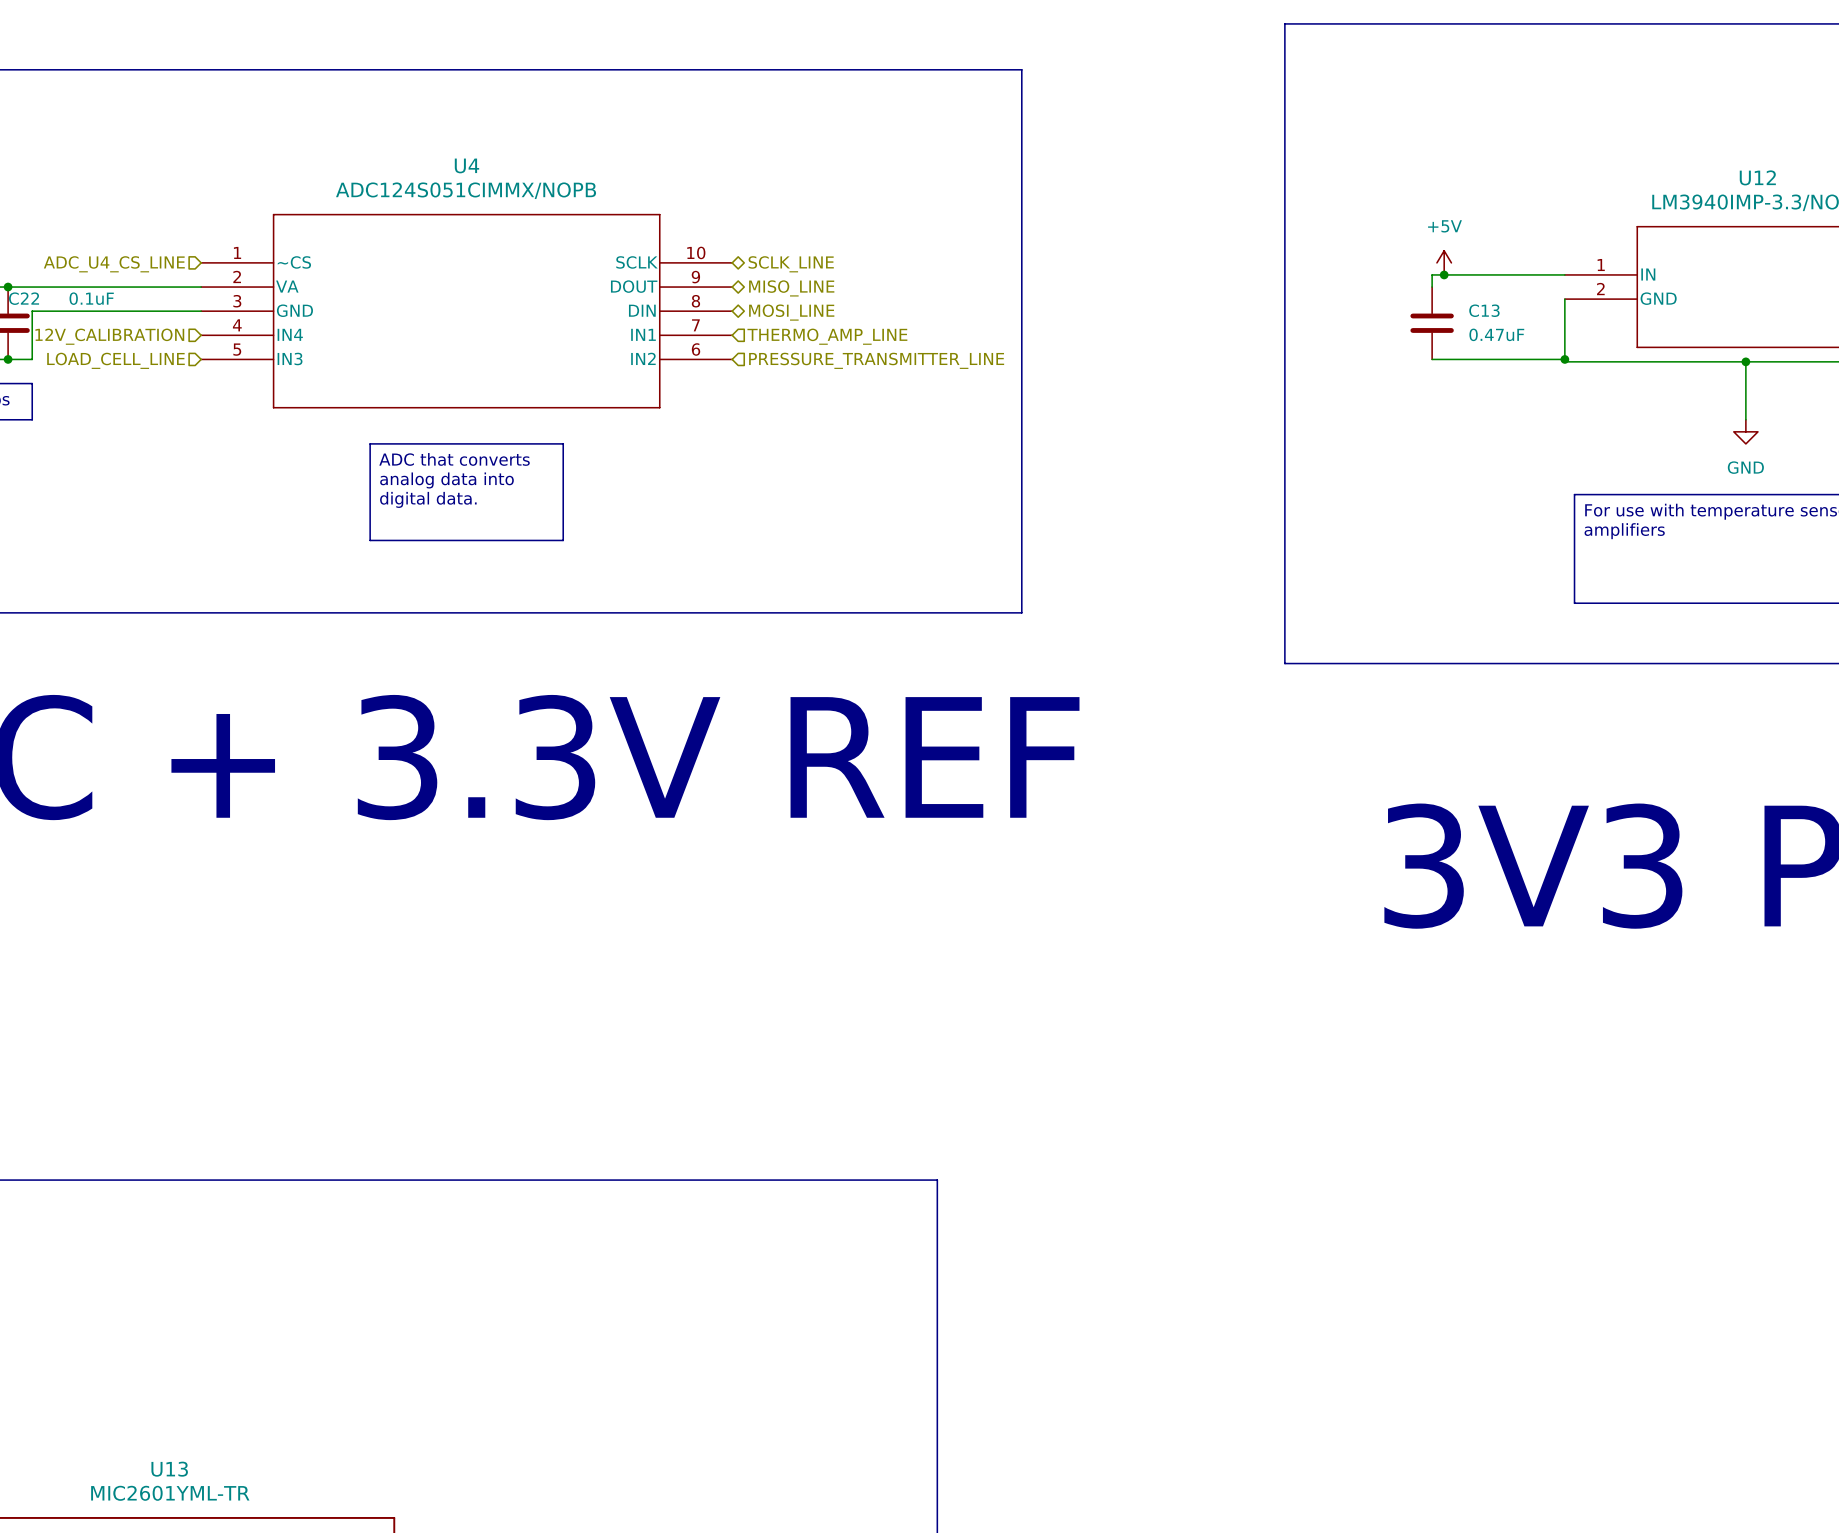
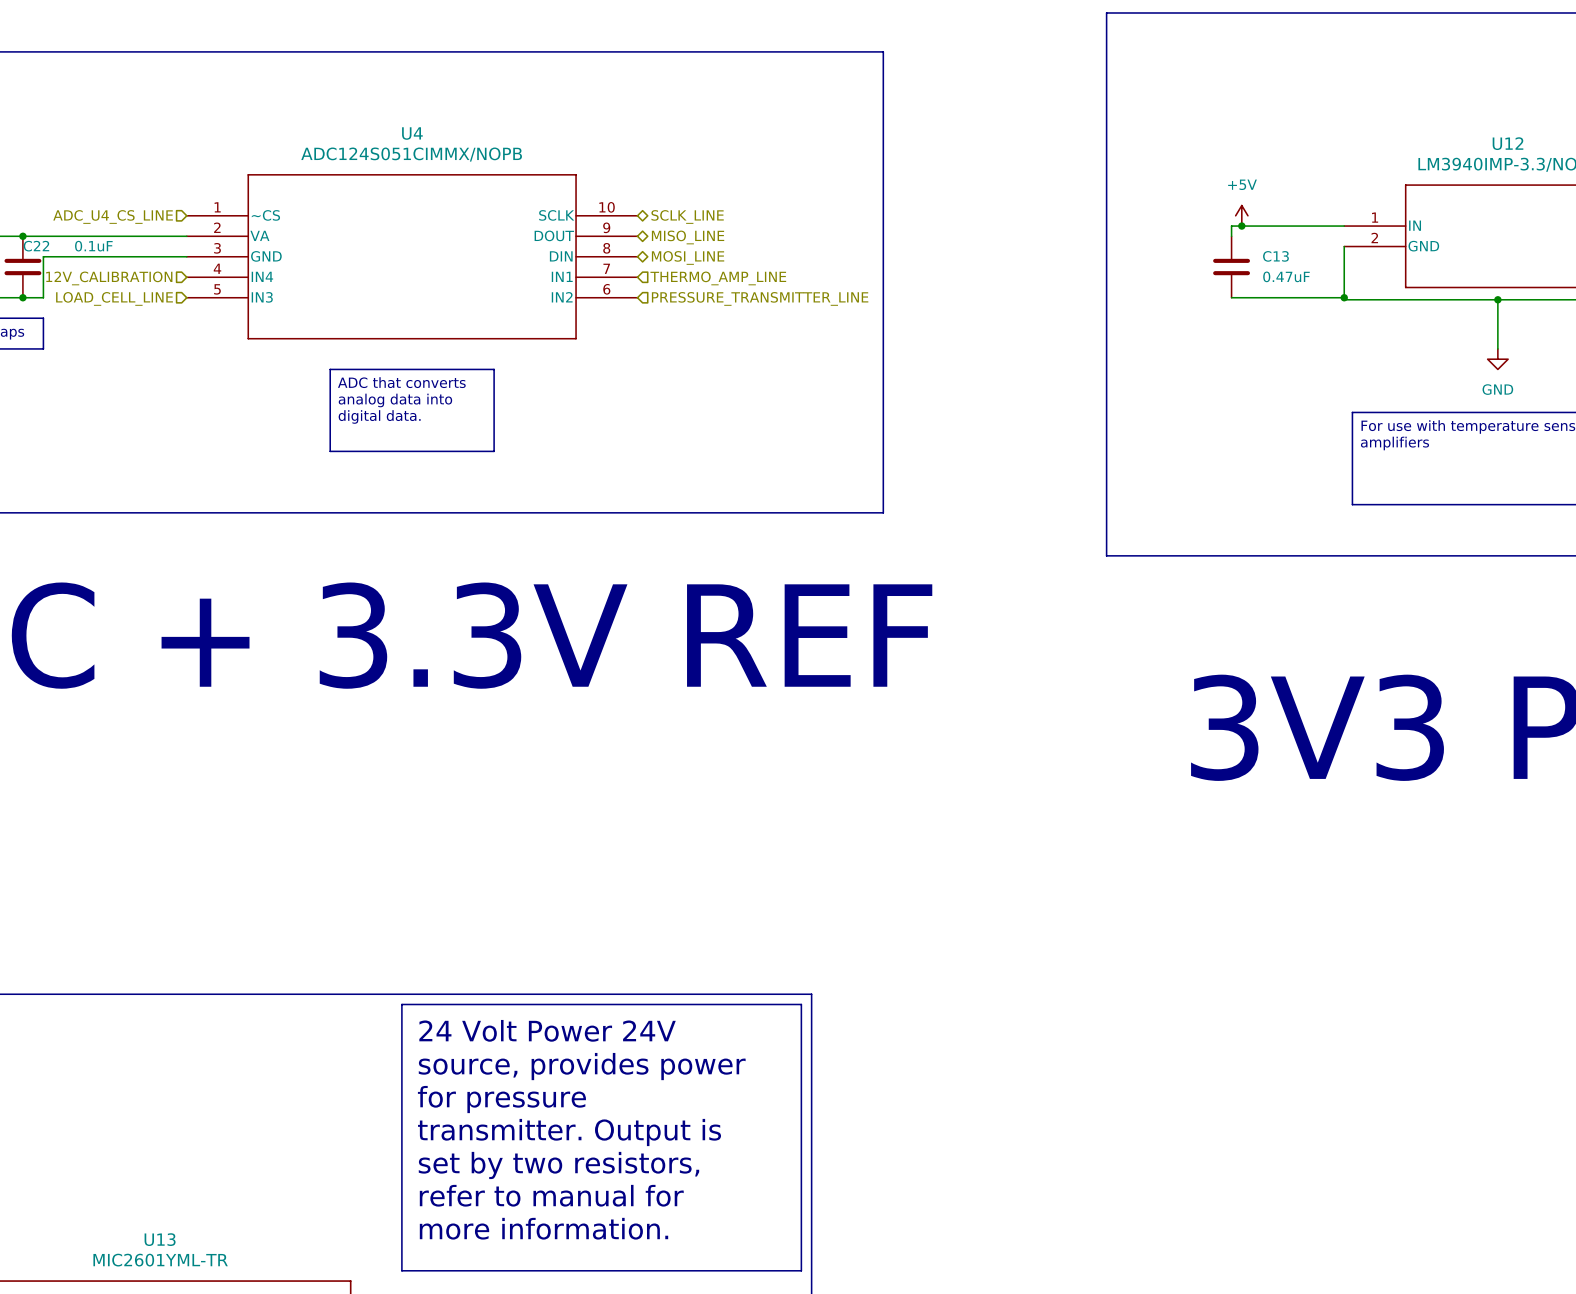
line: none -> (401, 1004) (801, 1004) (801, 1270) (401, 1270) (401, 1004)
text: none -> 24 Volt Power 24V (547, 1030)
text: none -> source, provides power (582, 1066)
text: none -> for pressure (501, 1099)
text: none -> transmitter. Output is (569, 1132)
text: none -> set by two resistors, (558, 1165)
text: none -> refer to manual for (551, 1195)
text: none -> more information. (543, 1228)

